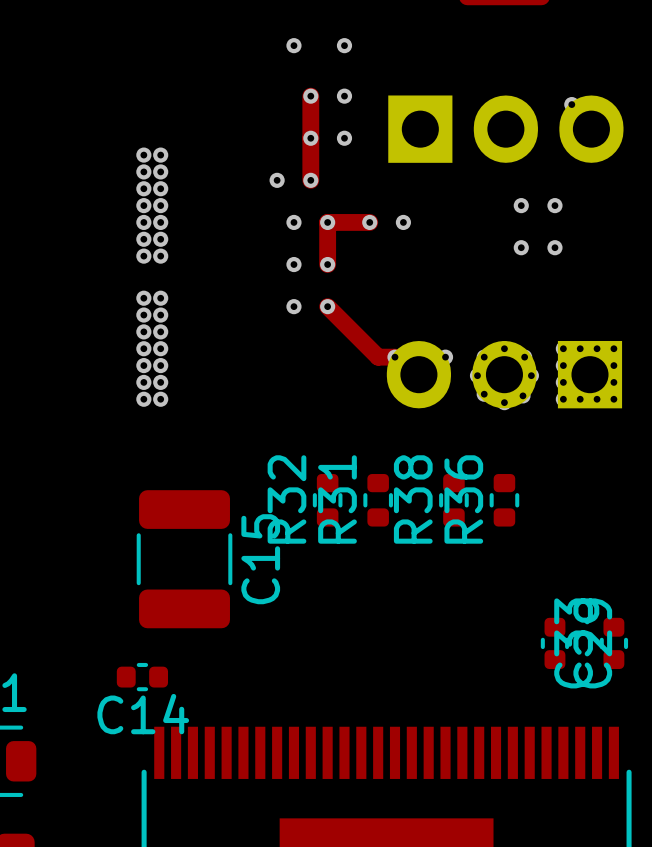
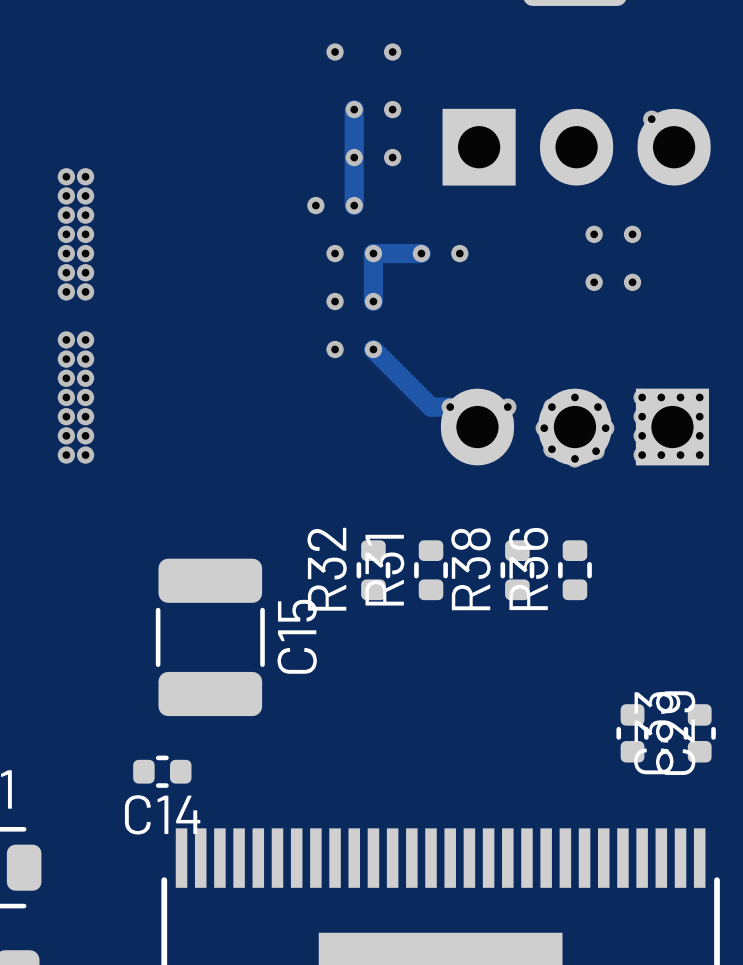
via: none -> (66, 176)
via: none -> (85, 176)
via: (143, 155) -> none
via: (160, 155) -> none
via: none -> (66, 195)
via: none -> (85, 195)
via: (143, 171) -> none
via: (160, 171) -> none
via: none -> (66, 215)
via: none -> (85, 215)
via: (143, 188) -> none
via: (160, 188) -> none
via: none -> (66, 234)
via: none -> (85, 234)
via: (143, 205) -> none
via: (160, 205) -> none
via: none -> (66, 253)
via: none -> (85, 253)
via: (143, 222) -> none
via: (160, 222) -> none
via: none -> (66, 272)
via: none -> (85, 272)
via: (143, 239) -> none
via: (160, 239) -> none
via: none -> (66, 291)
via: none -> (85, 291)
via: (143, 256) -> none
via: (160, 256) -> none
via: none -> (66, 339)
via: none -> (85, 339)
via: (143, 298) -> none
via: (160, 298) -> none
via: none -> (66, 359)
via: none -> (85, 359)
via: (143, 315) -> none
via: (160, 315) -> none
via: none -> (66, 378)
via: none -> (85, 378)
via: (143, 331) -> none
via: (160, 331) -> none
via: none -> (66, 397)
via: none -> (85, 397)
via: (143, 348) -> none
via: (160, 348) -> none
via: none -> (66, 416)
via: none -> (85, 416)
via: (143, 365) -> none
via: (160, 365) -> none
via: none -> (66, 435)
via: none -> (85, 435)
via: (143, 382) -> none
via: (160, 382) -> none
via: none -> (66, 455)
via: none -> (85, 455)
via: (143, 399) -> none
via: (160, 399) -> none

